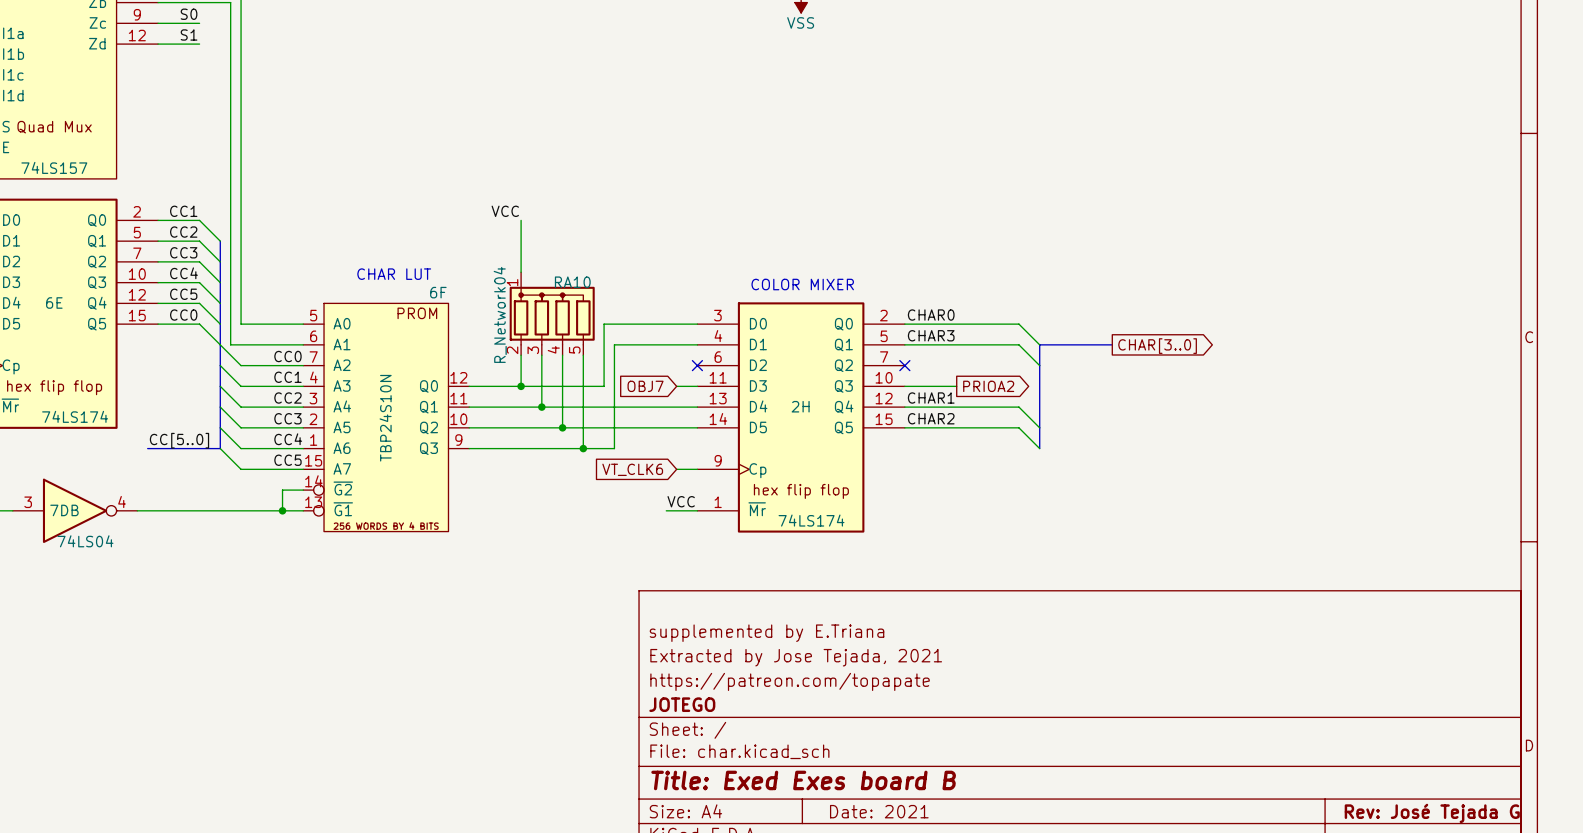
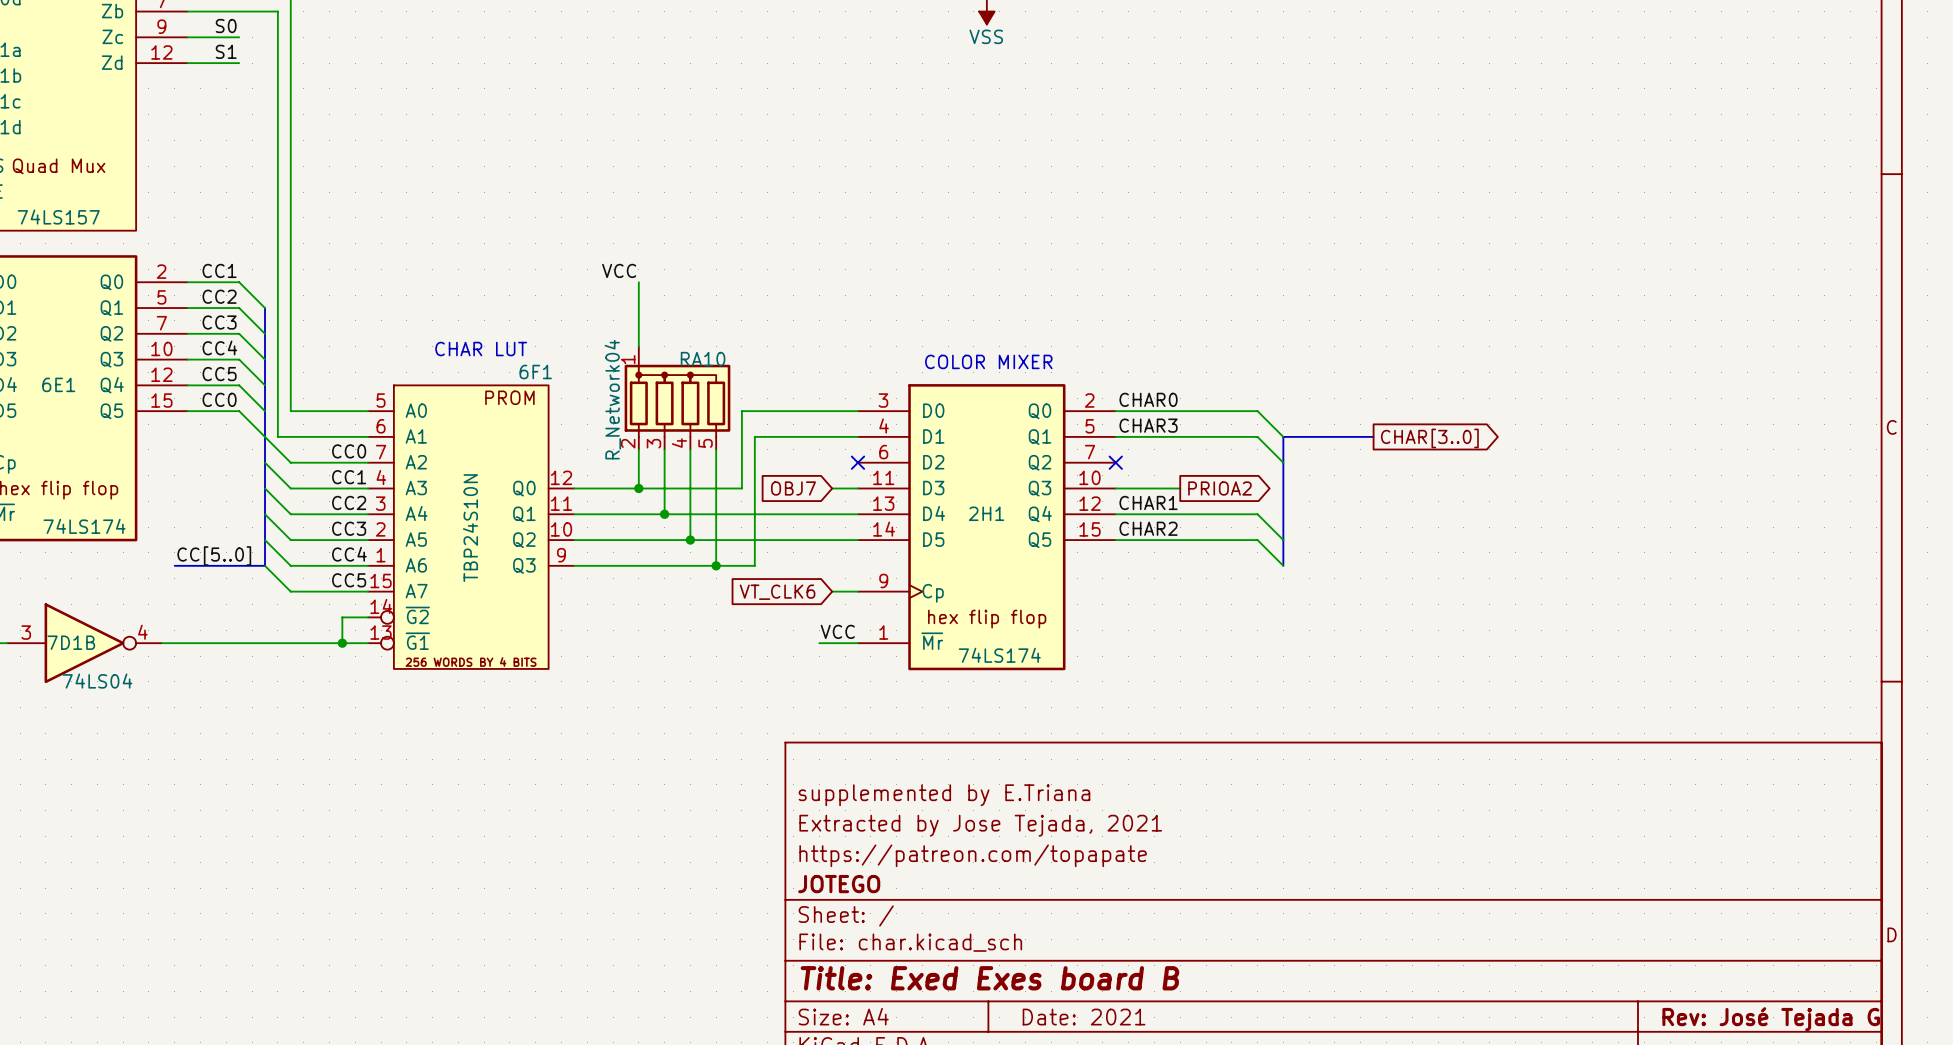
6F name: 6F (438, 292) -> 6F1 (535, 372)
6E name: 6E (54, 302) -> 6E1 (58, 384)
2H name: 2H (800, 406) -> 2H1 (986, 513)
7DB name: 7DB (64, 510) -> 7D1B (71, 642)

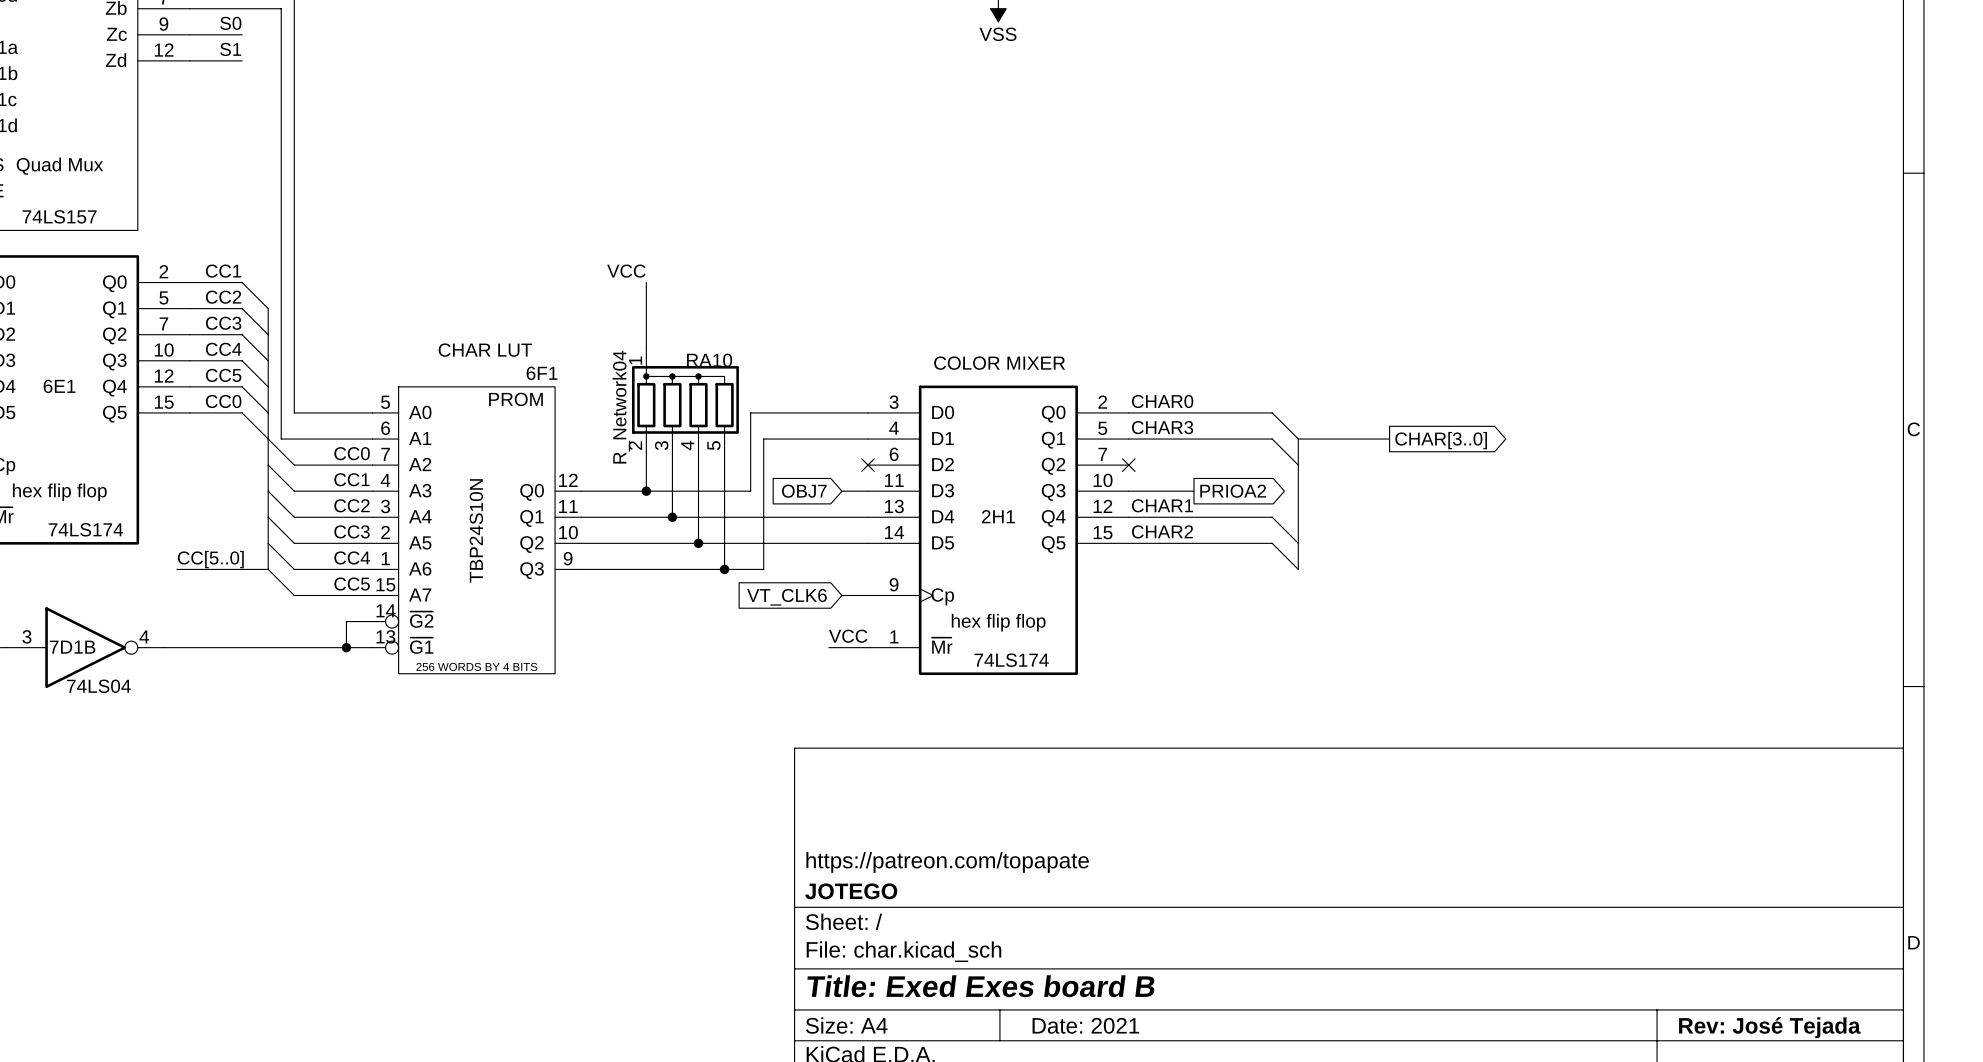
title block: supplemented by E.Triana (944, 795) -> none
title block: Extracted by Jose Tejada, 2021 (980, 825) -> none
title block: Rev: José Tejada G (1771, 1019) -> Rev: José Tejada (1769, 1027)

